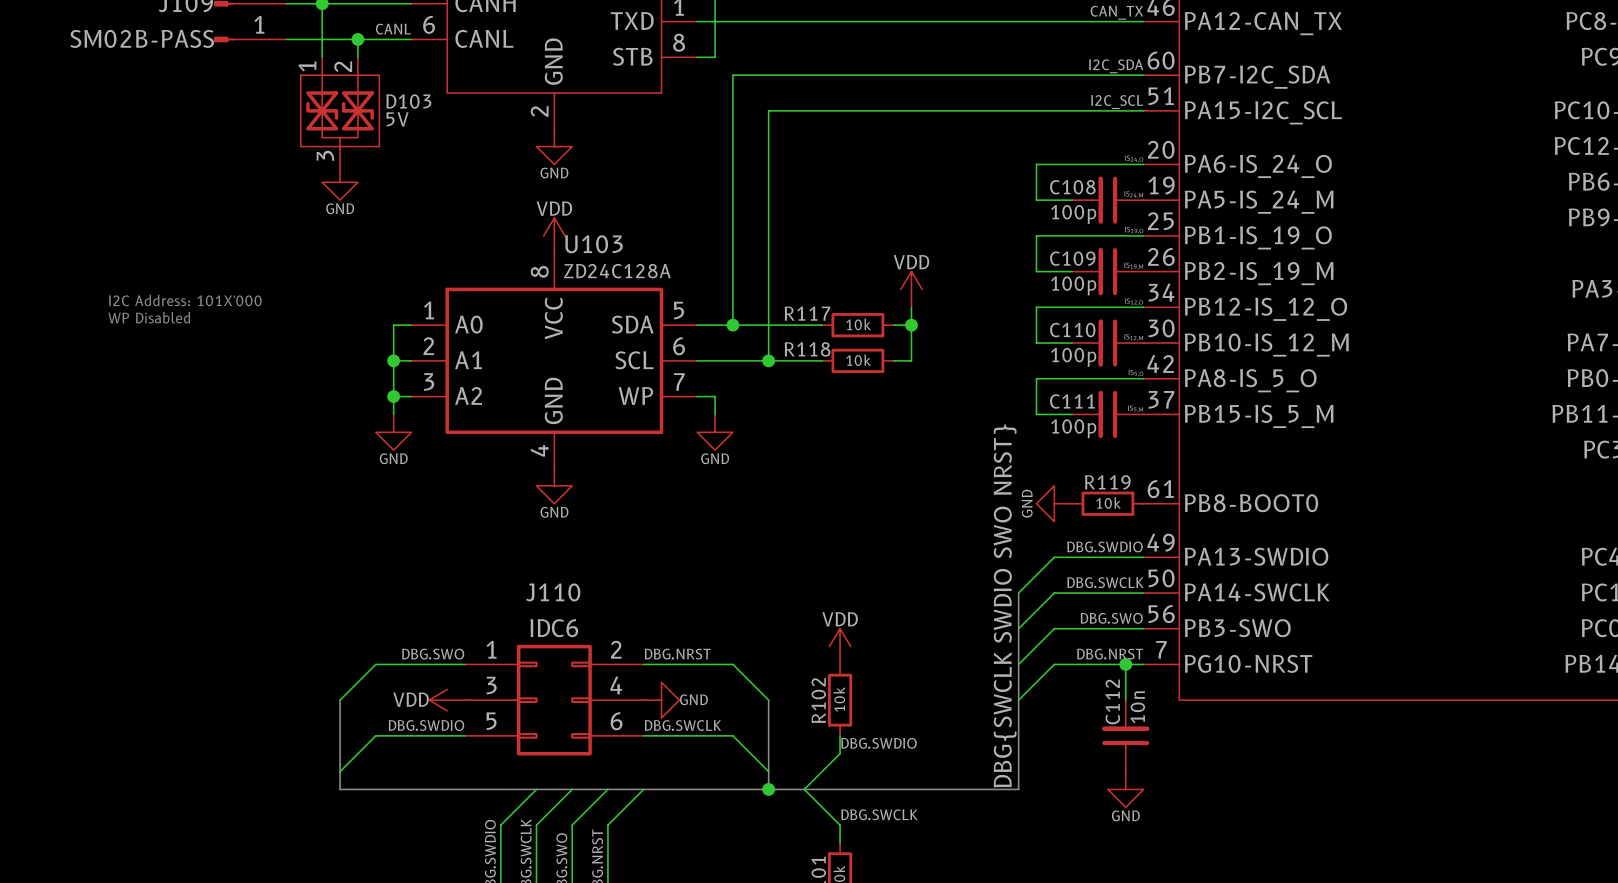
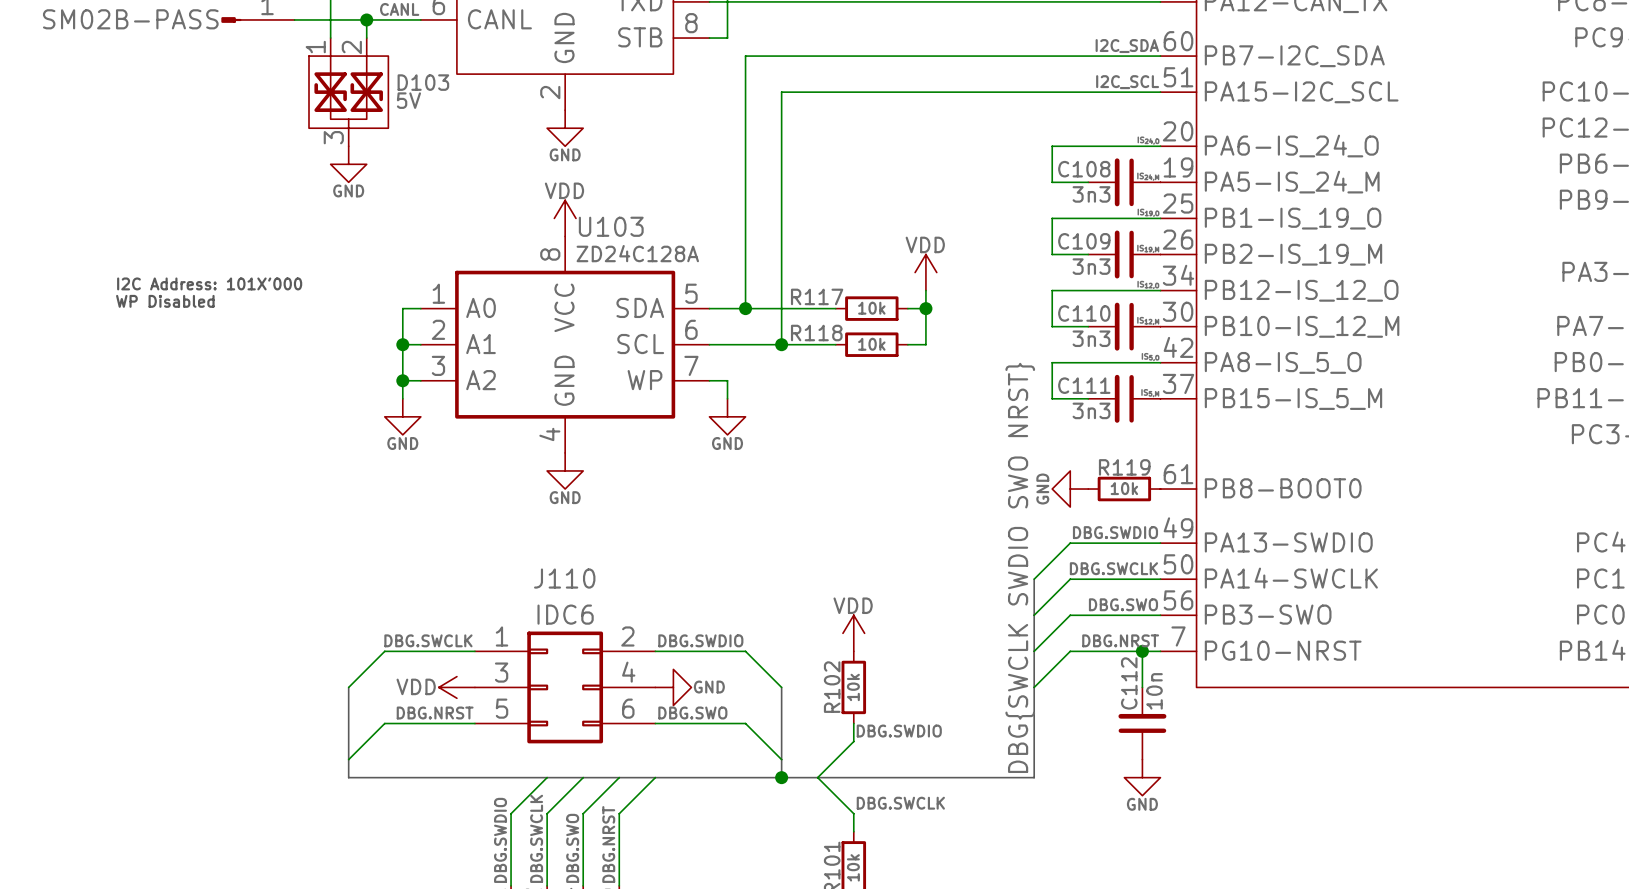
C108 value: 100p (1073, 214) -> 3n3 (1091, 194)
C109 value: 100p (1073, 285) -> 3n3 (1091, 266)
C110 value: 100p (1073, 357) -> 3n3 (1091, 338)
C111 value: 100p (1073, 428) -> 3n3 (1091, 410)
label: DBG.SWO (433, 654) -> DBG.SWCLK (428, 640)
label: DBG.NRST (677, 654) -> DBG.SWDIO (700, 640)
label: DBG.SWDIO (426, 725) -> DBG.NRST (435, 713)
label: DBG.SWCLK (682, 725) -> DBG.SWO (692, 713)

